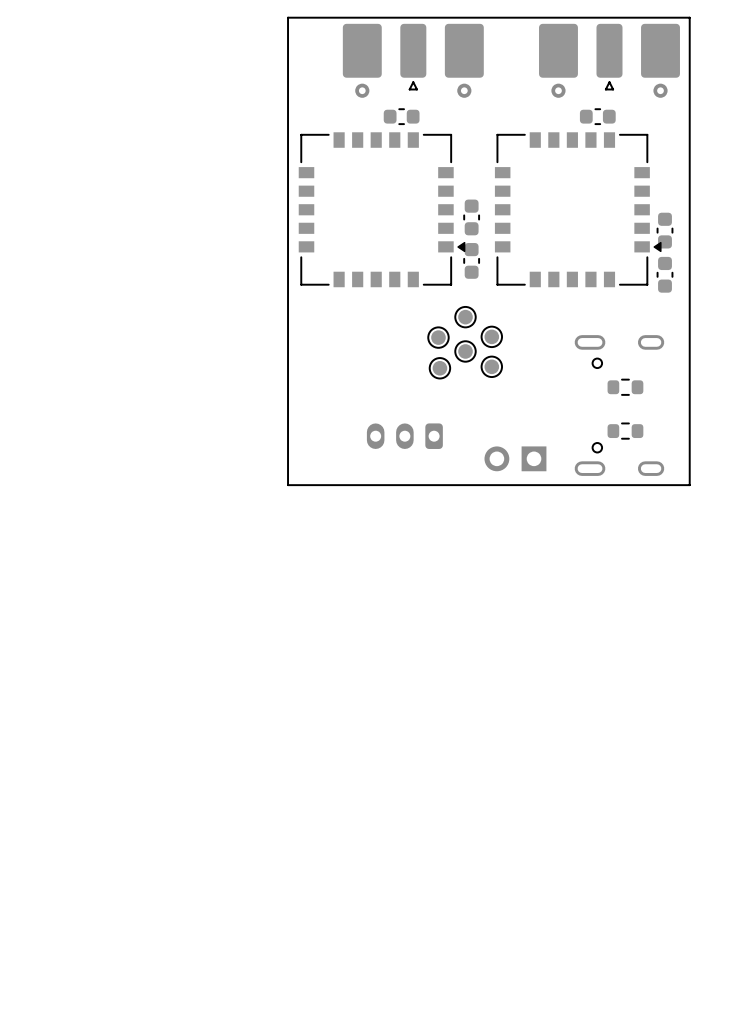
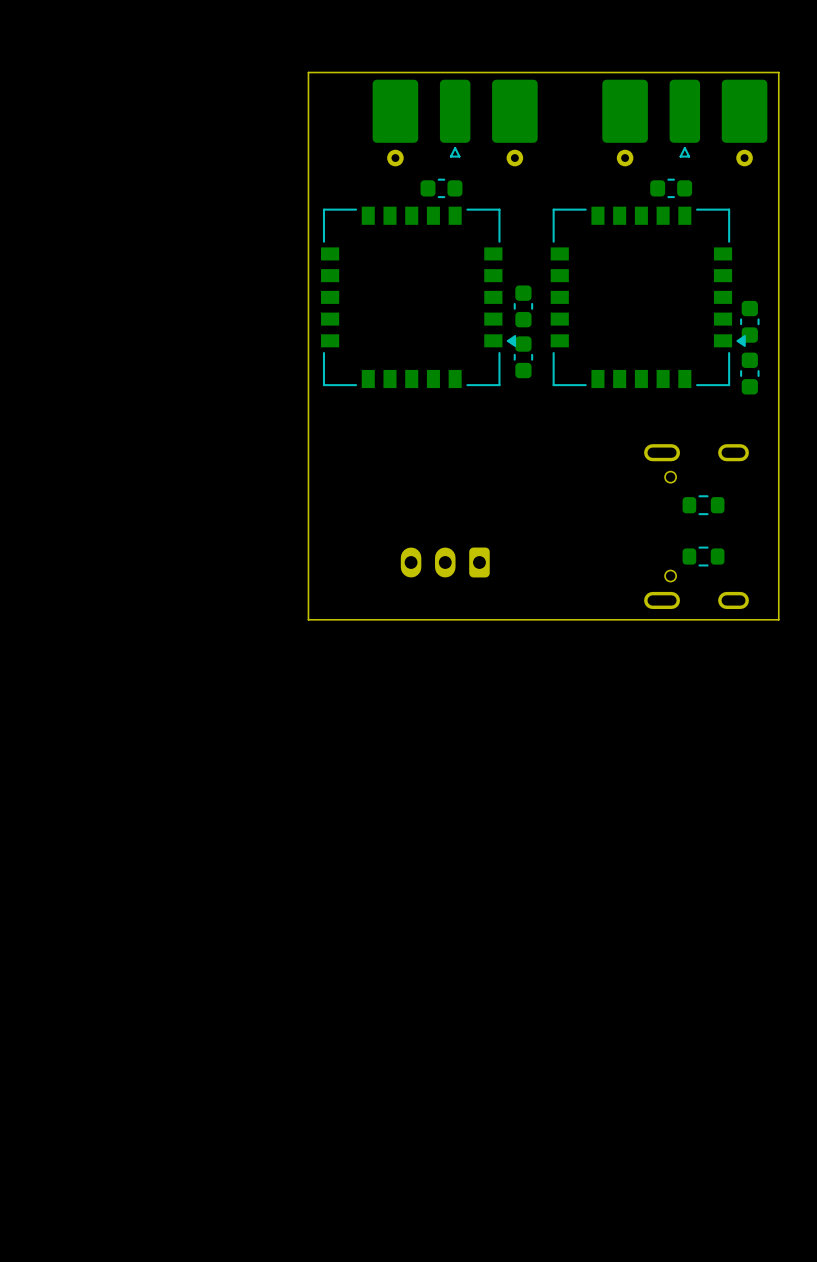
part: (465, 317) -> none
part: (491, 336) -> none
part: (438, 337) -> none
part: (465, 351) -> none
part: (491, 366) -> none
part: (439, 368) -> none
part: (515, 458) -> none

